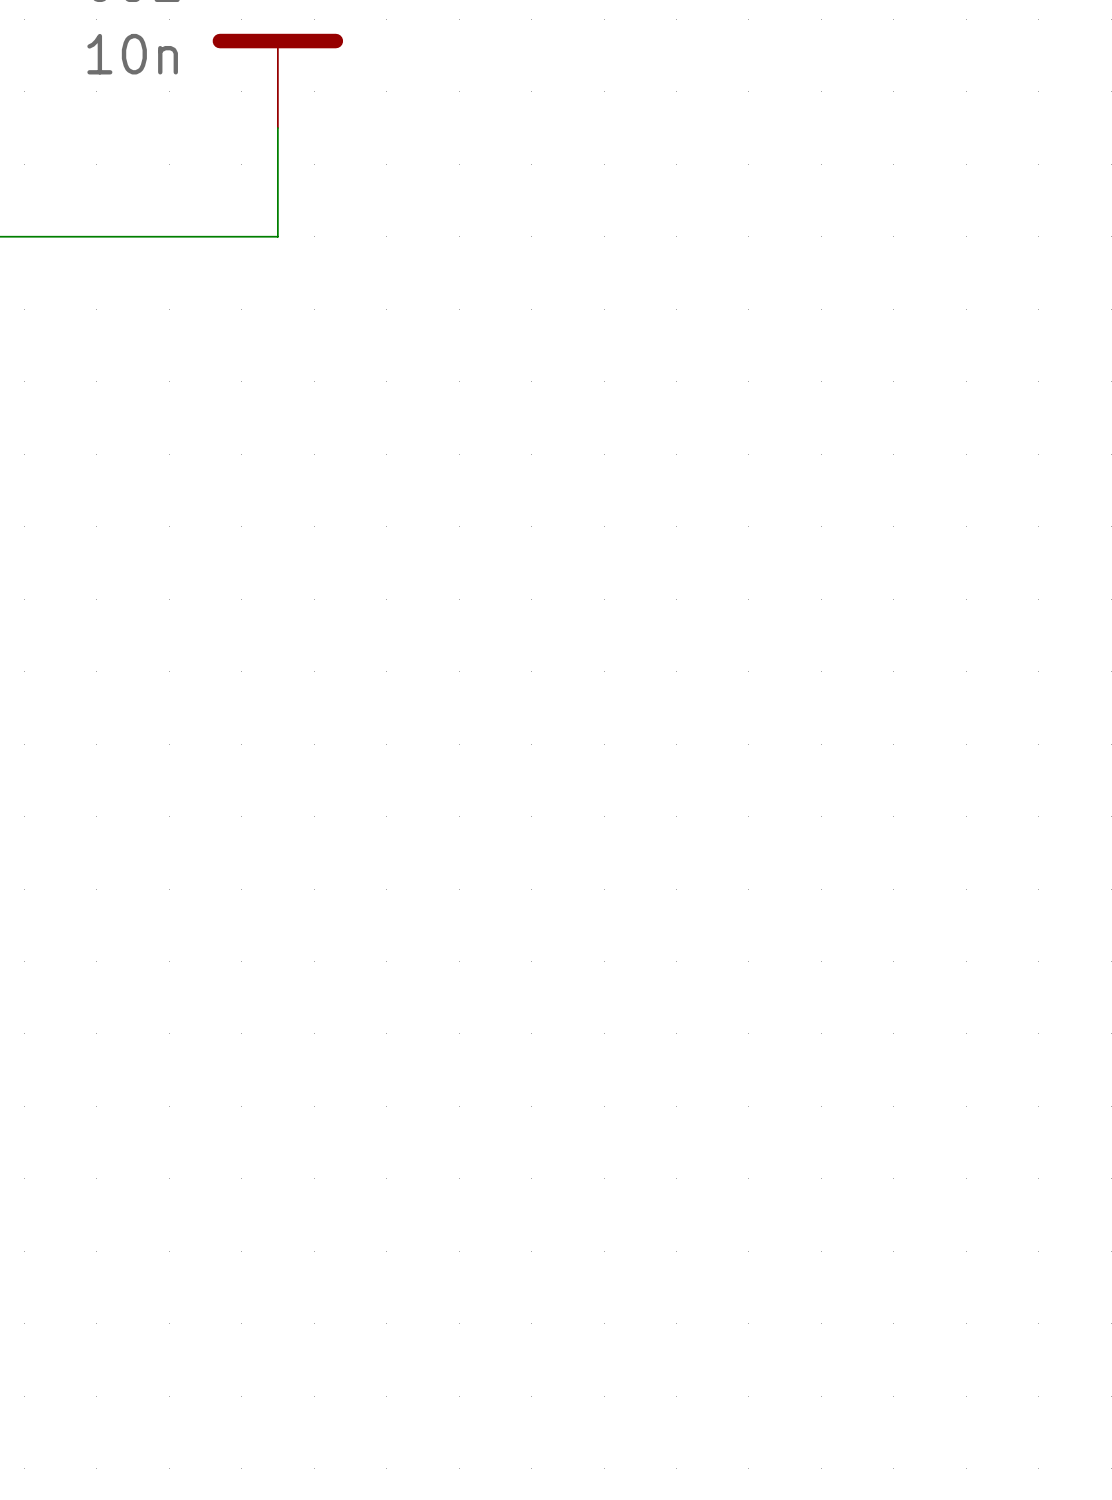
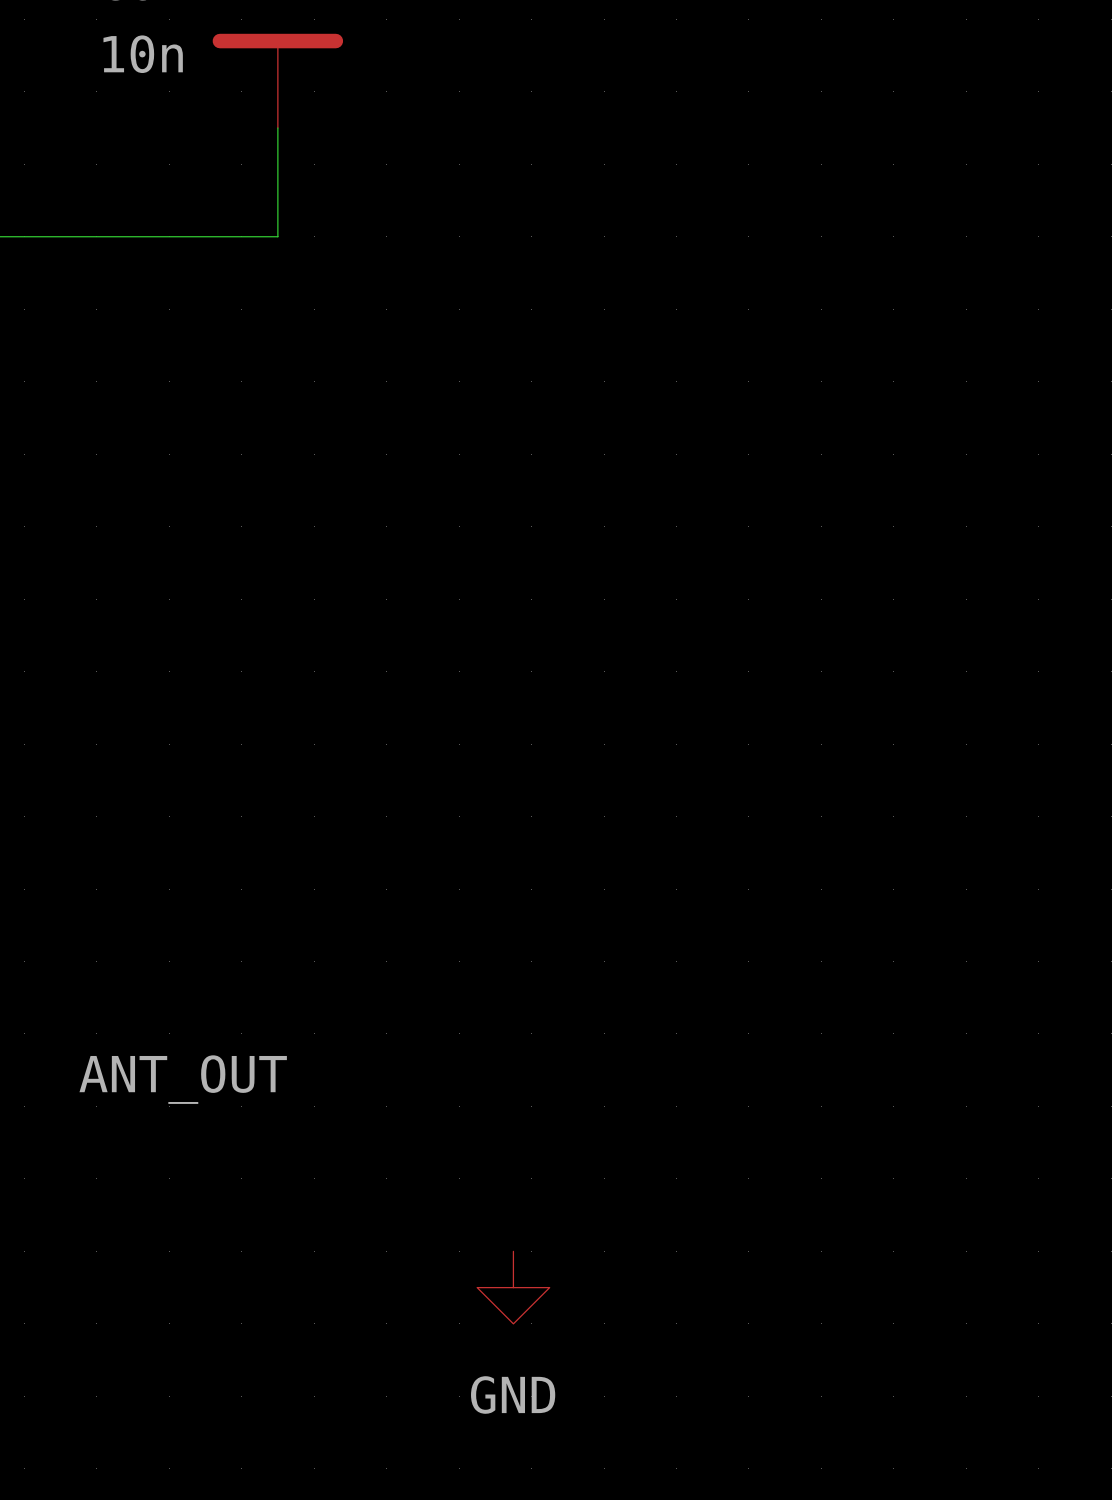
label: none -> ANT_OUT (183, 1079)
power symbol: none -> GND (513, 1287)

